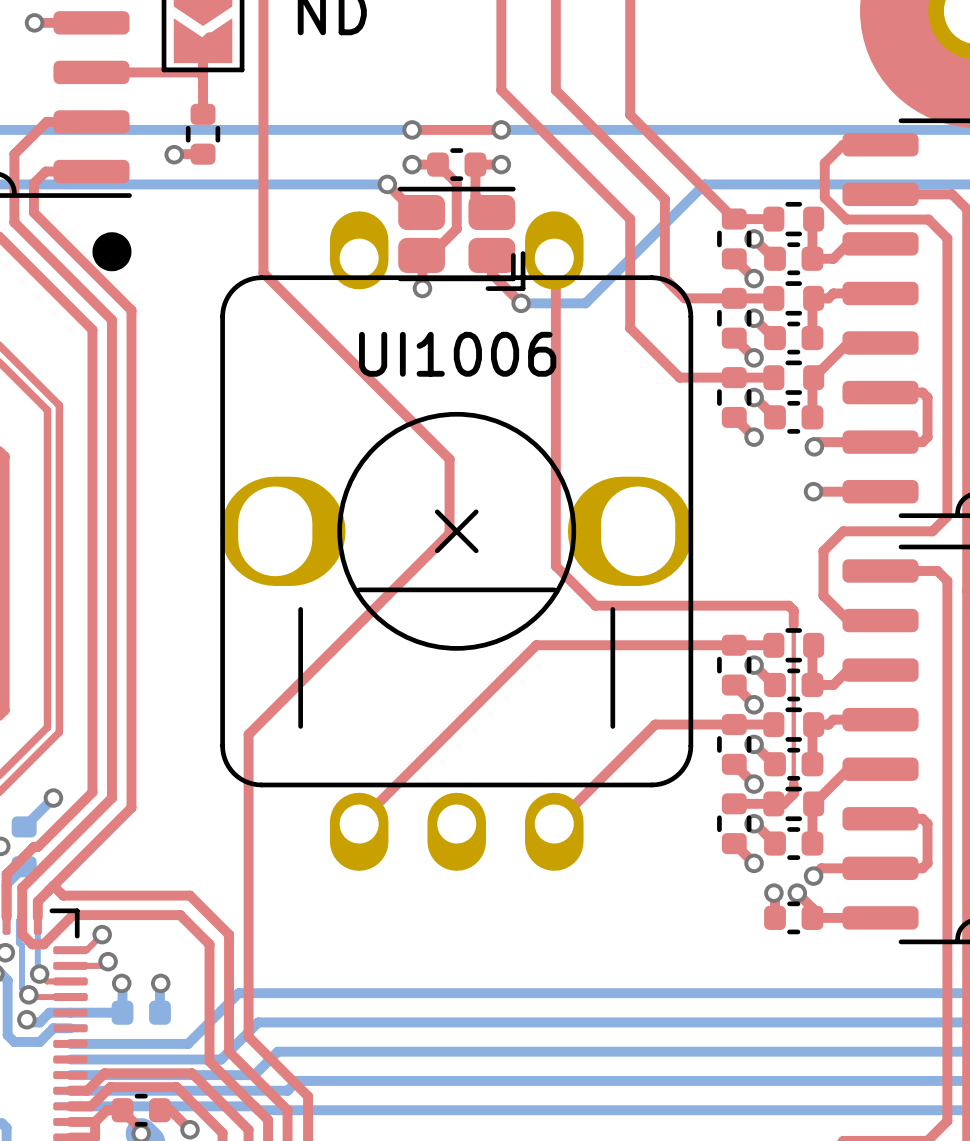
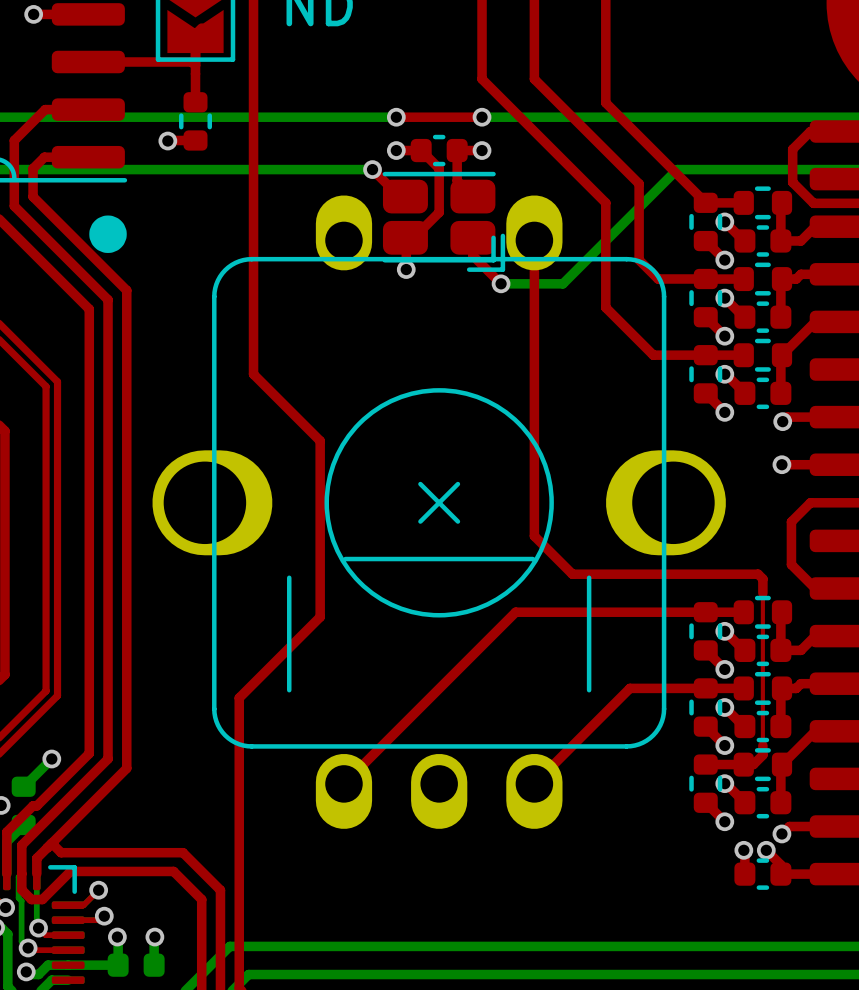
top track: (263, 273) (449, 459) (449, 533) (332, 650) -> (253, 254) (253, 374) (320, 440) (320, 617)
UI1006: (456, 541) -> none
part: none -> (439, 512)

